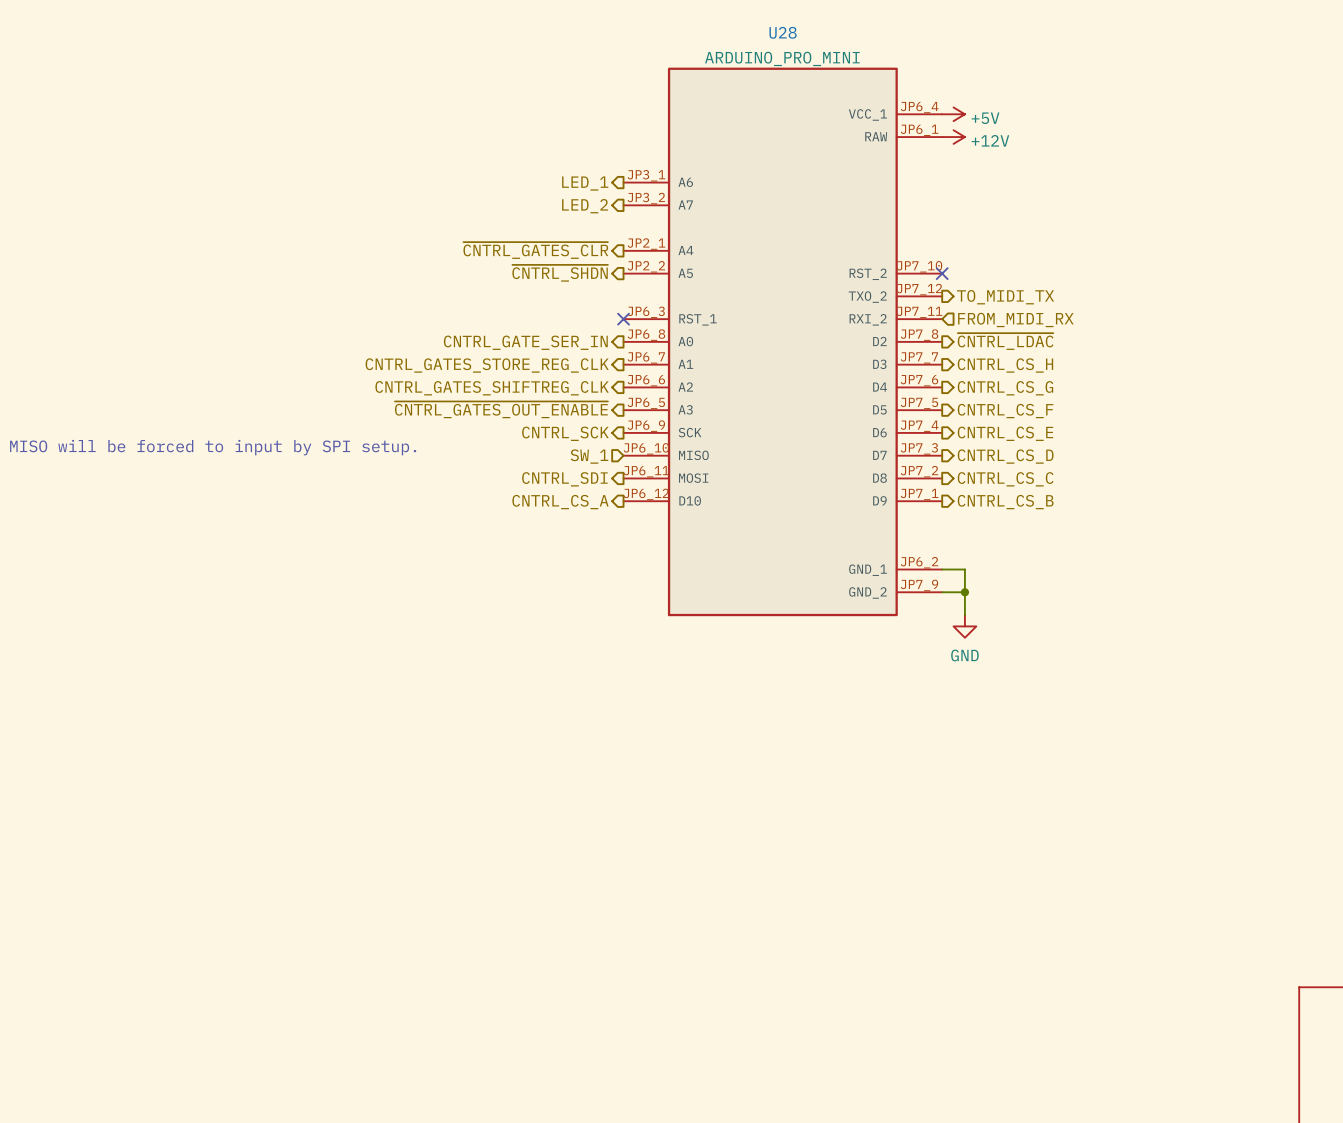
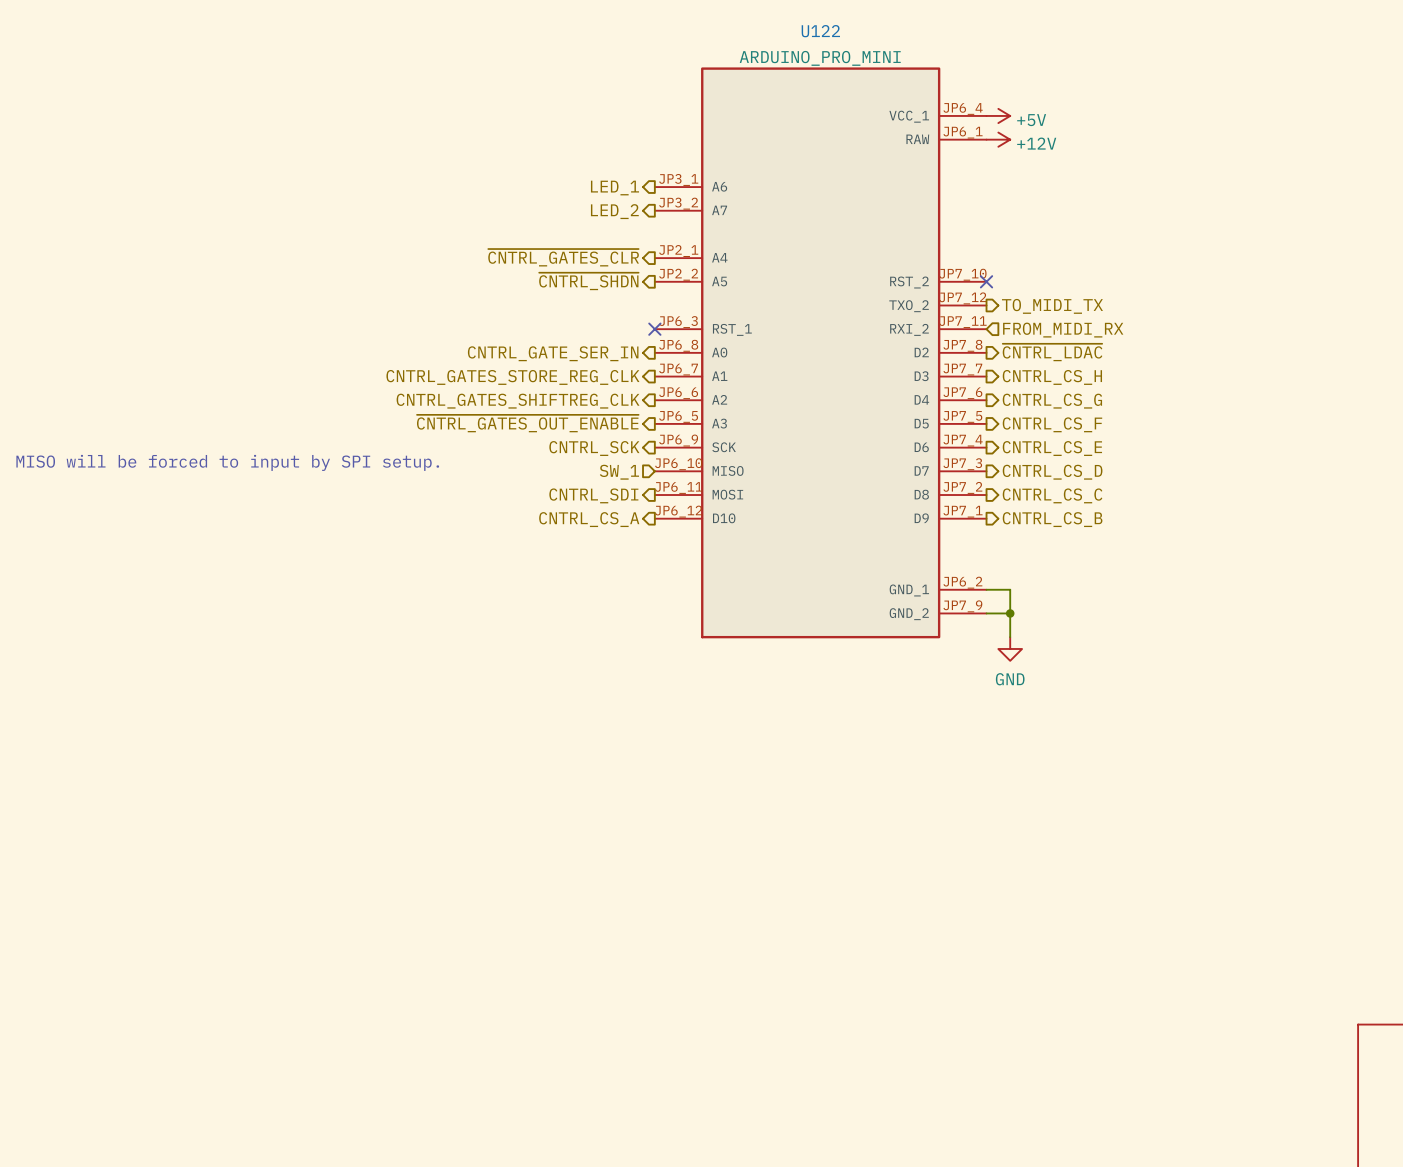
U28 name: U28 (783, 32) -> U122 (820, 31)

